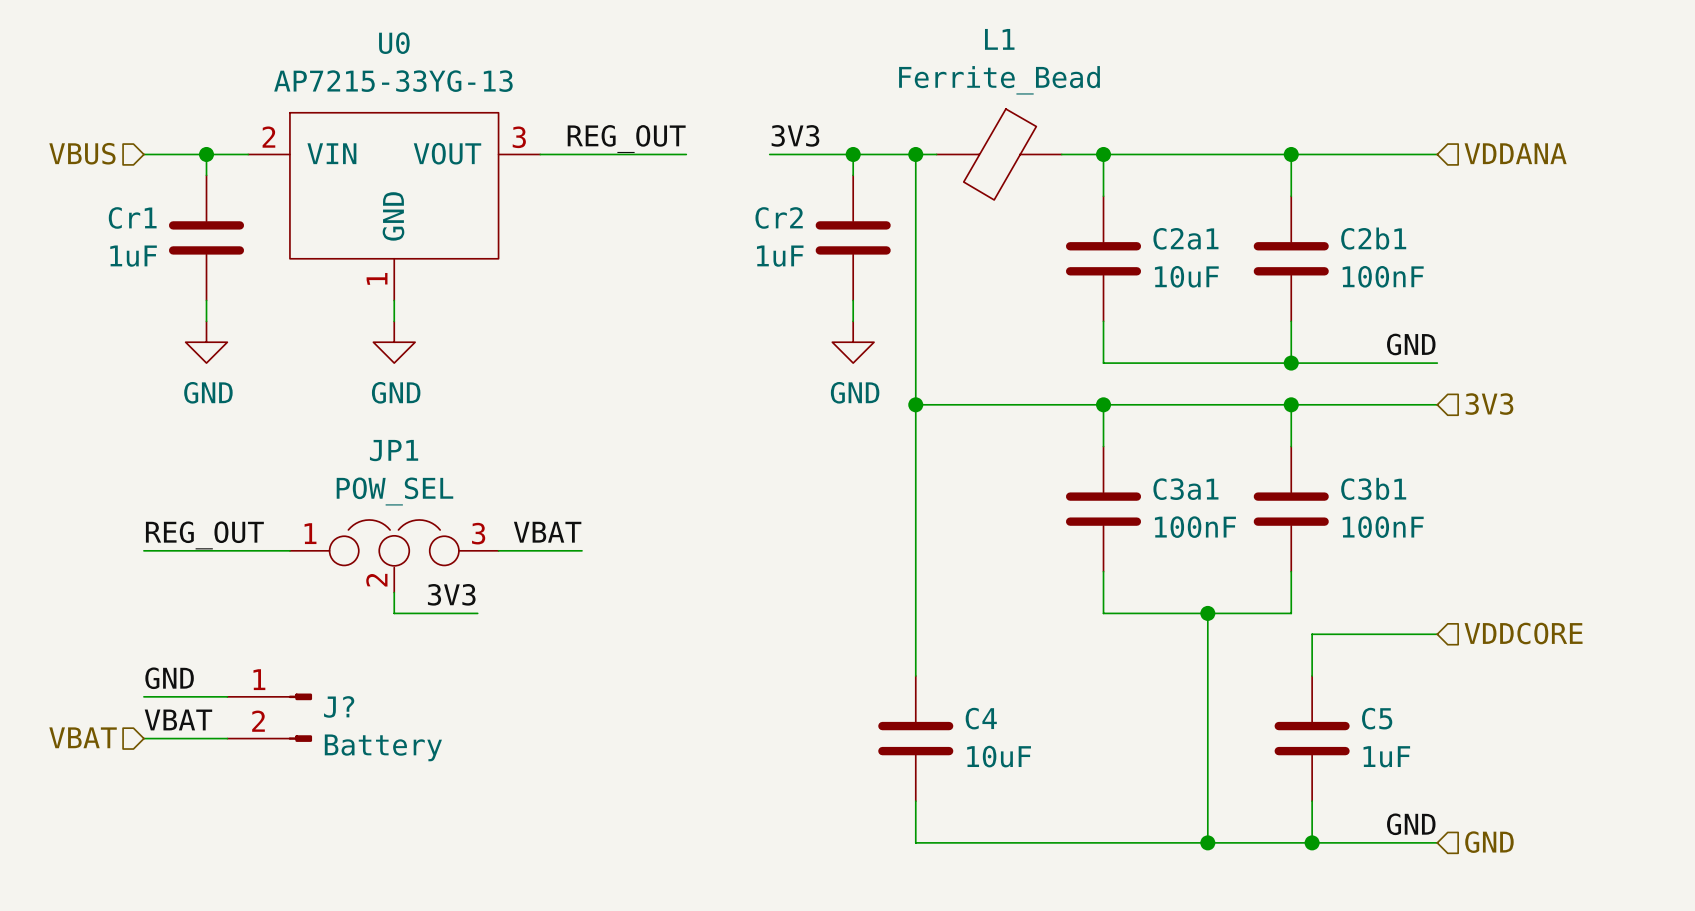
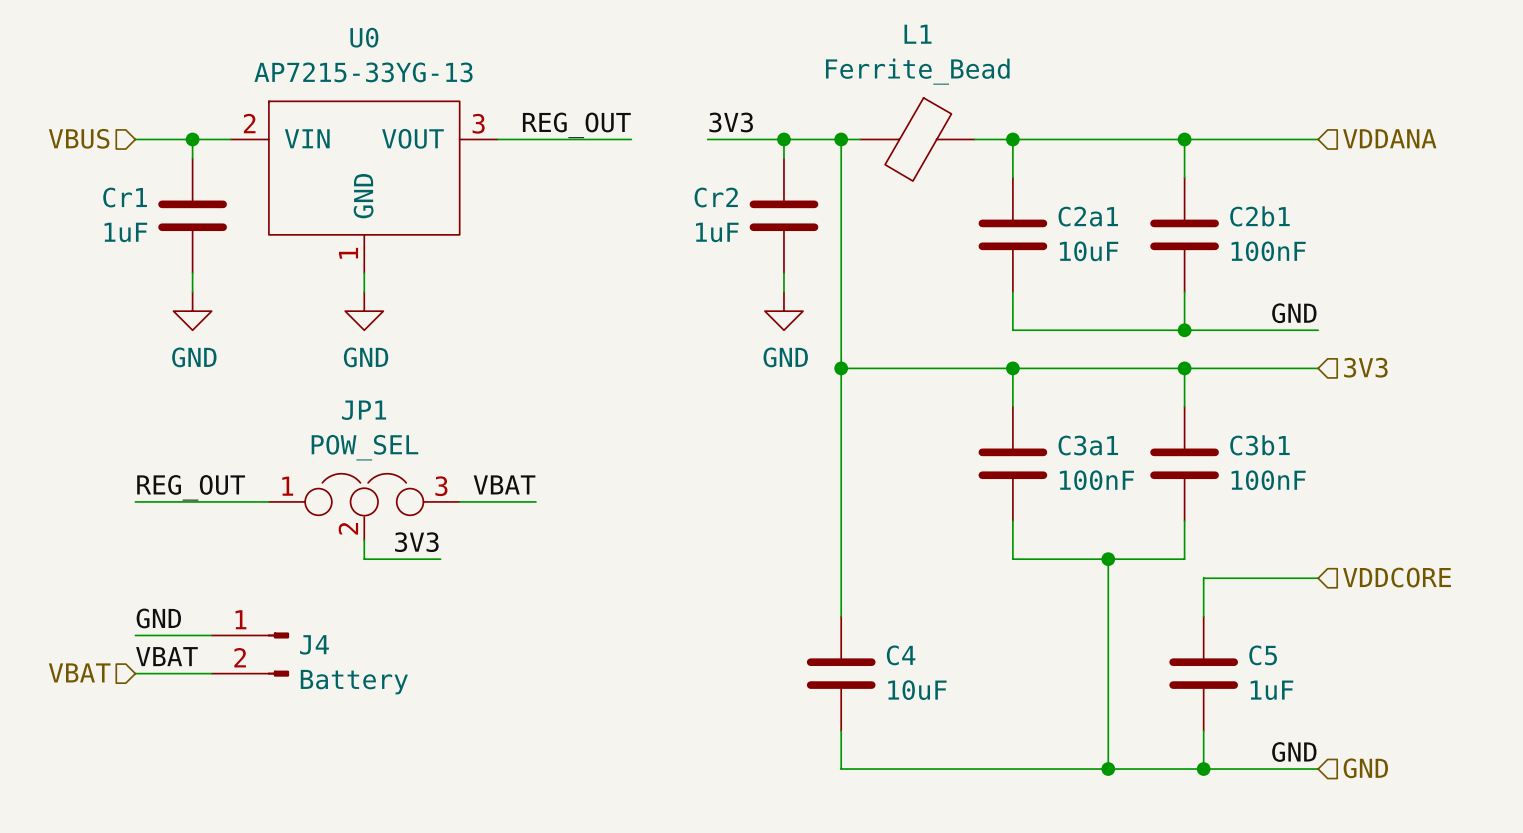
J? name: J? (339, 706) -> J4 (314, 644)

